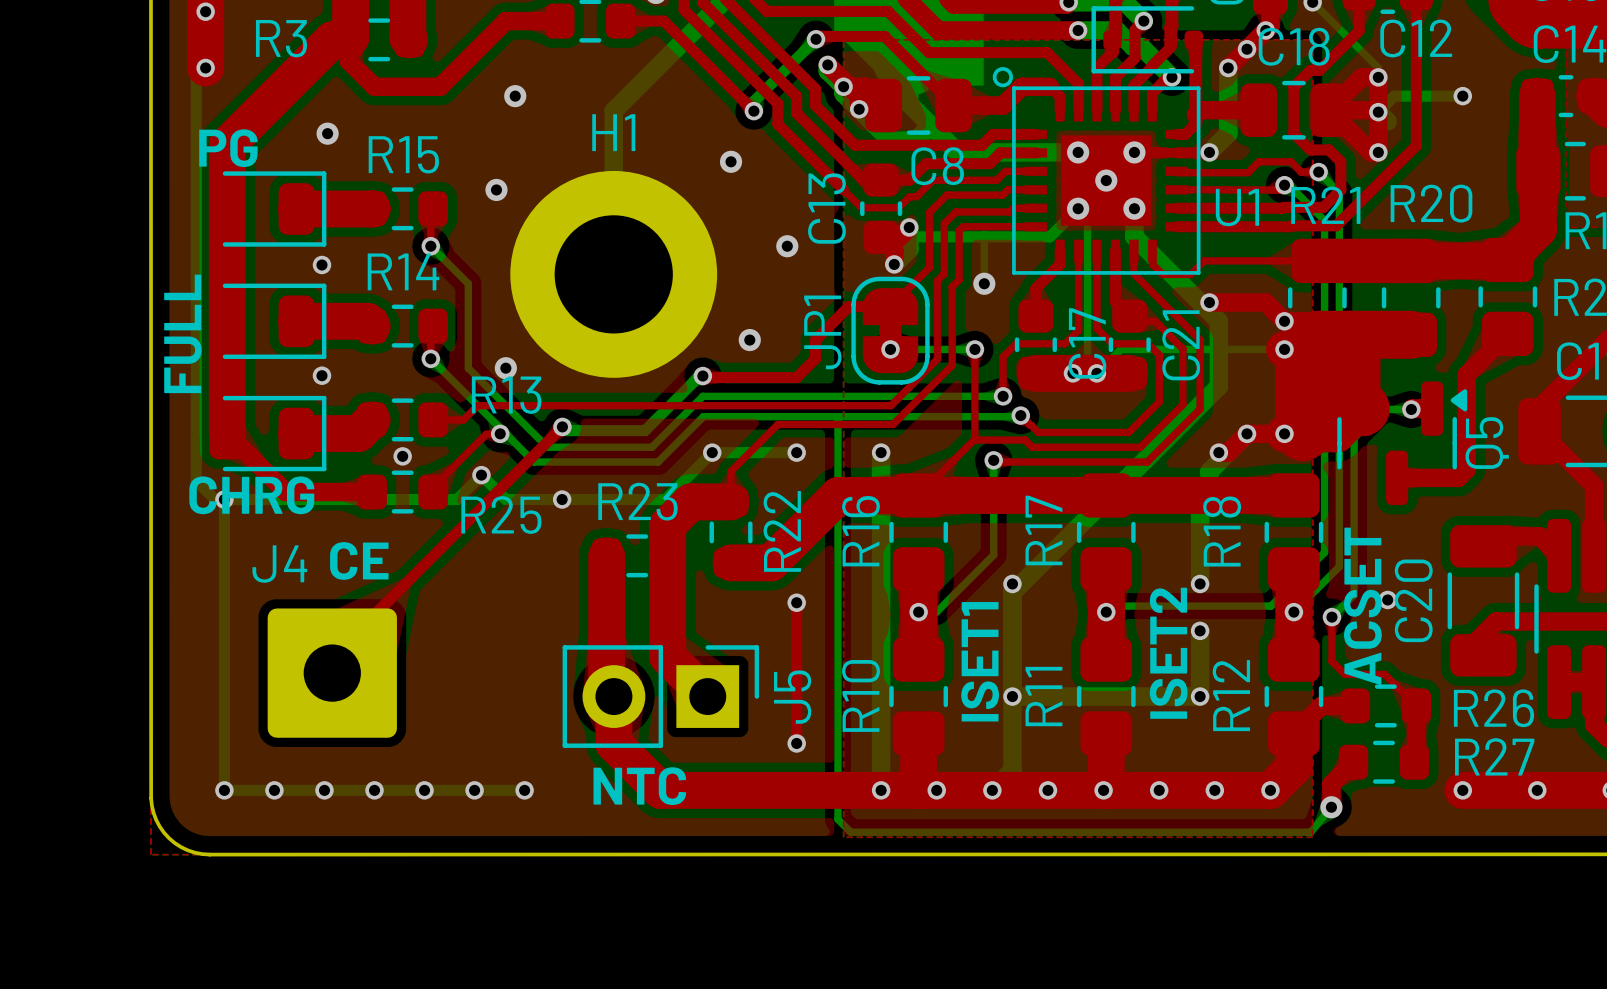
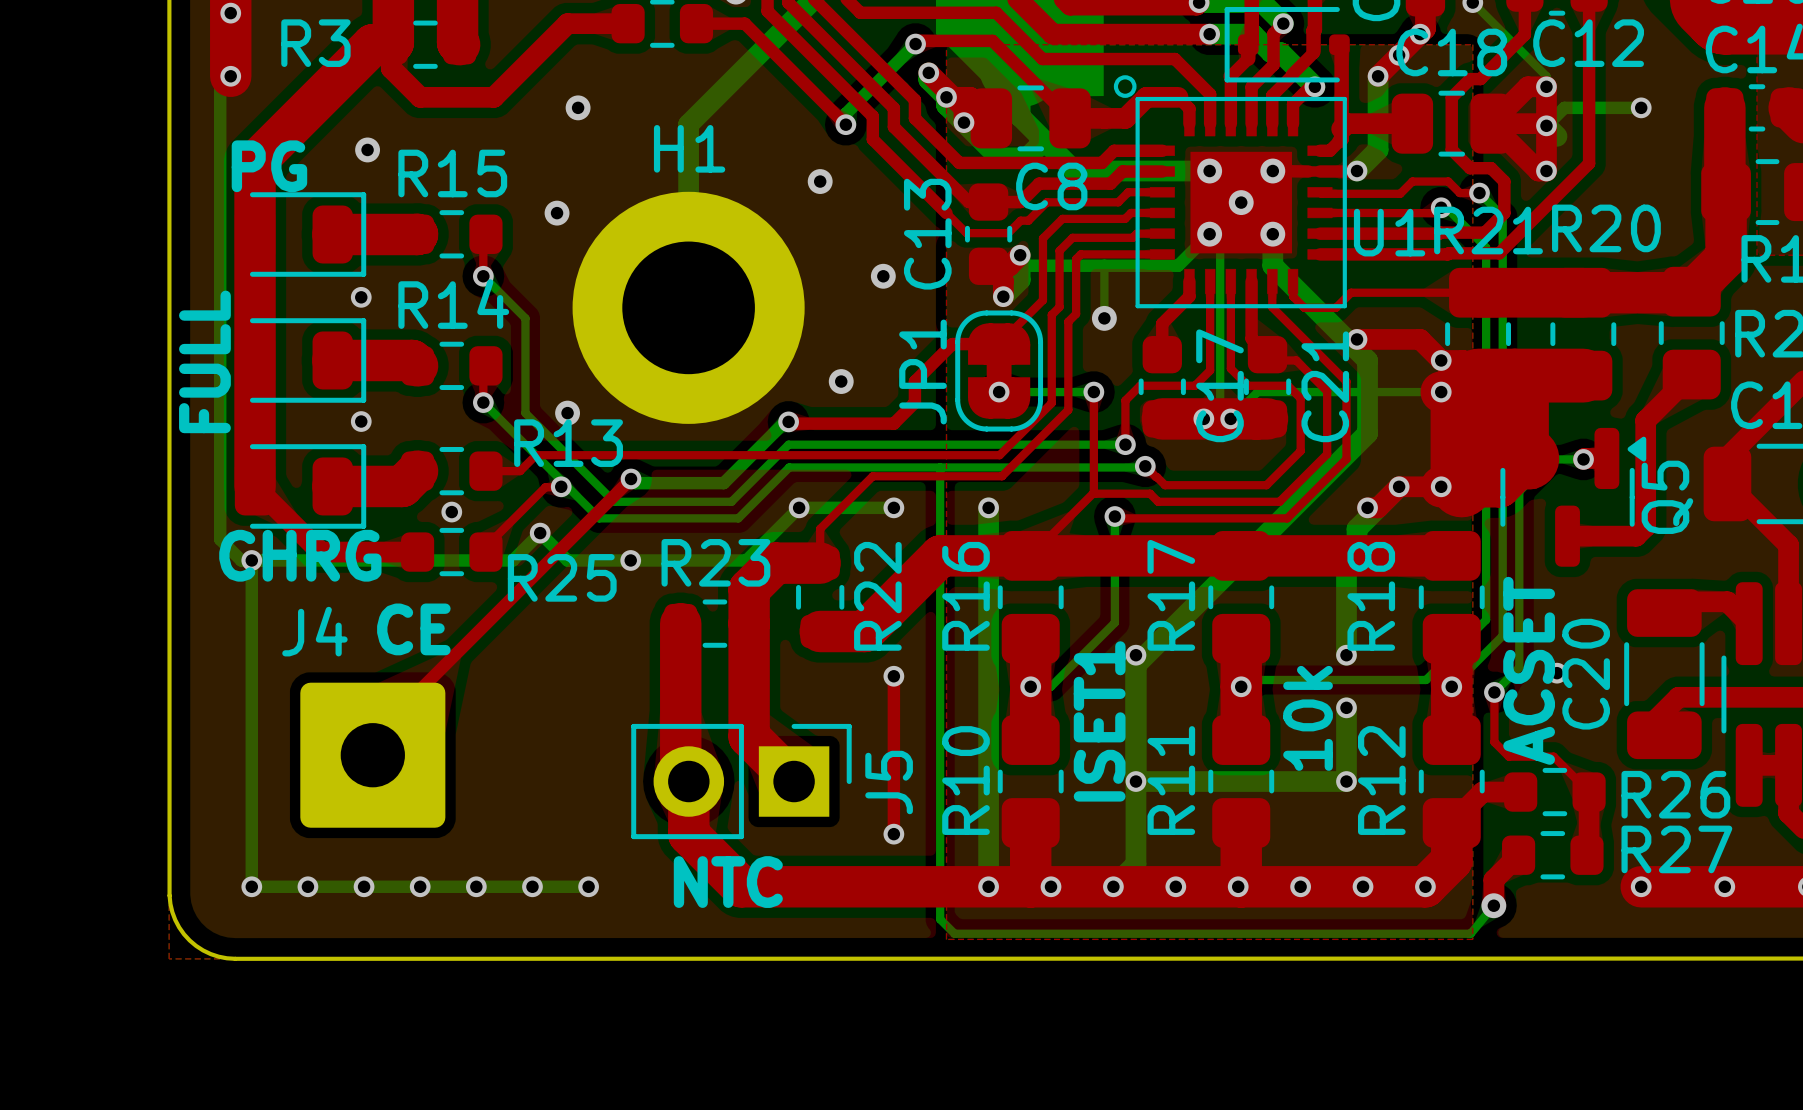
R11 value: none -> 10k (1308, 718)
text: ISET2 (1168, 653) -> none

